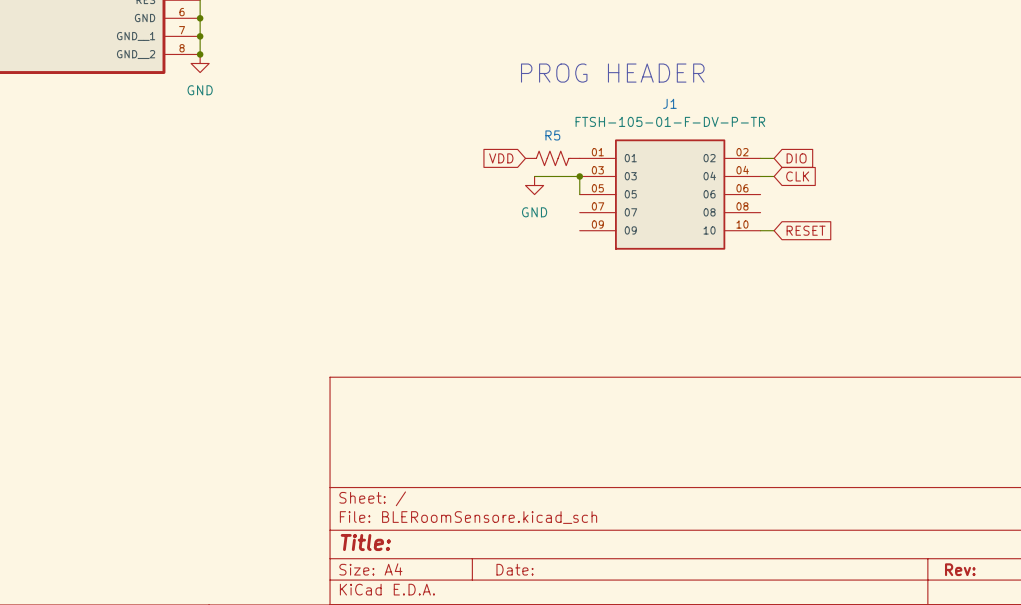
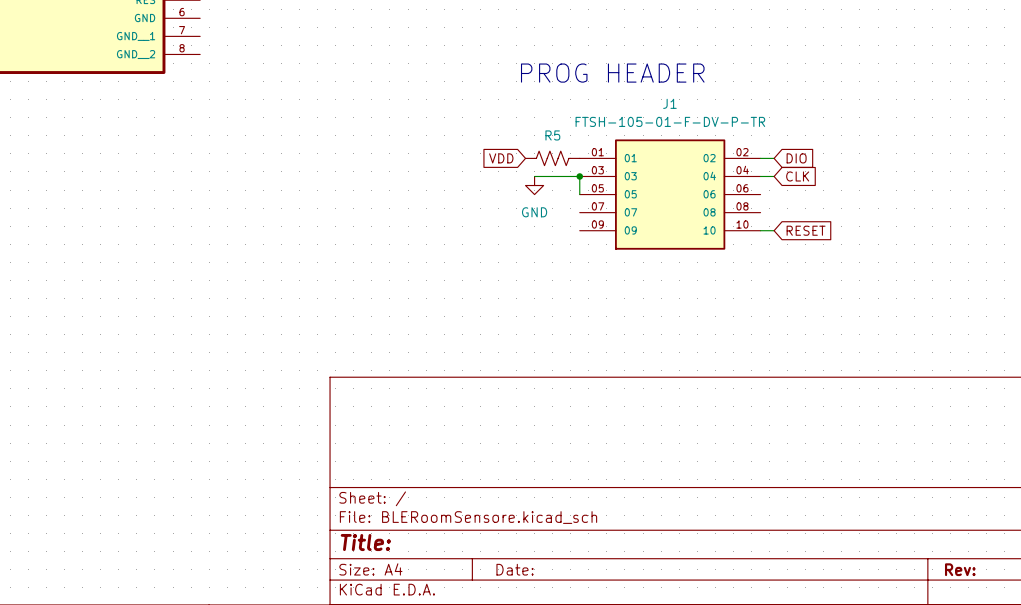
wire: (200, 0) (200, 54) -> none
junction: (200, 18) -> none
junction: (200, 36) -> none
junction: (200, 54) -> none
power symbol: GND (200, 63) -> none

